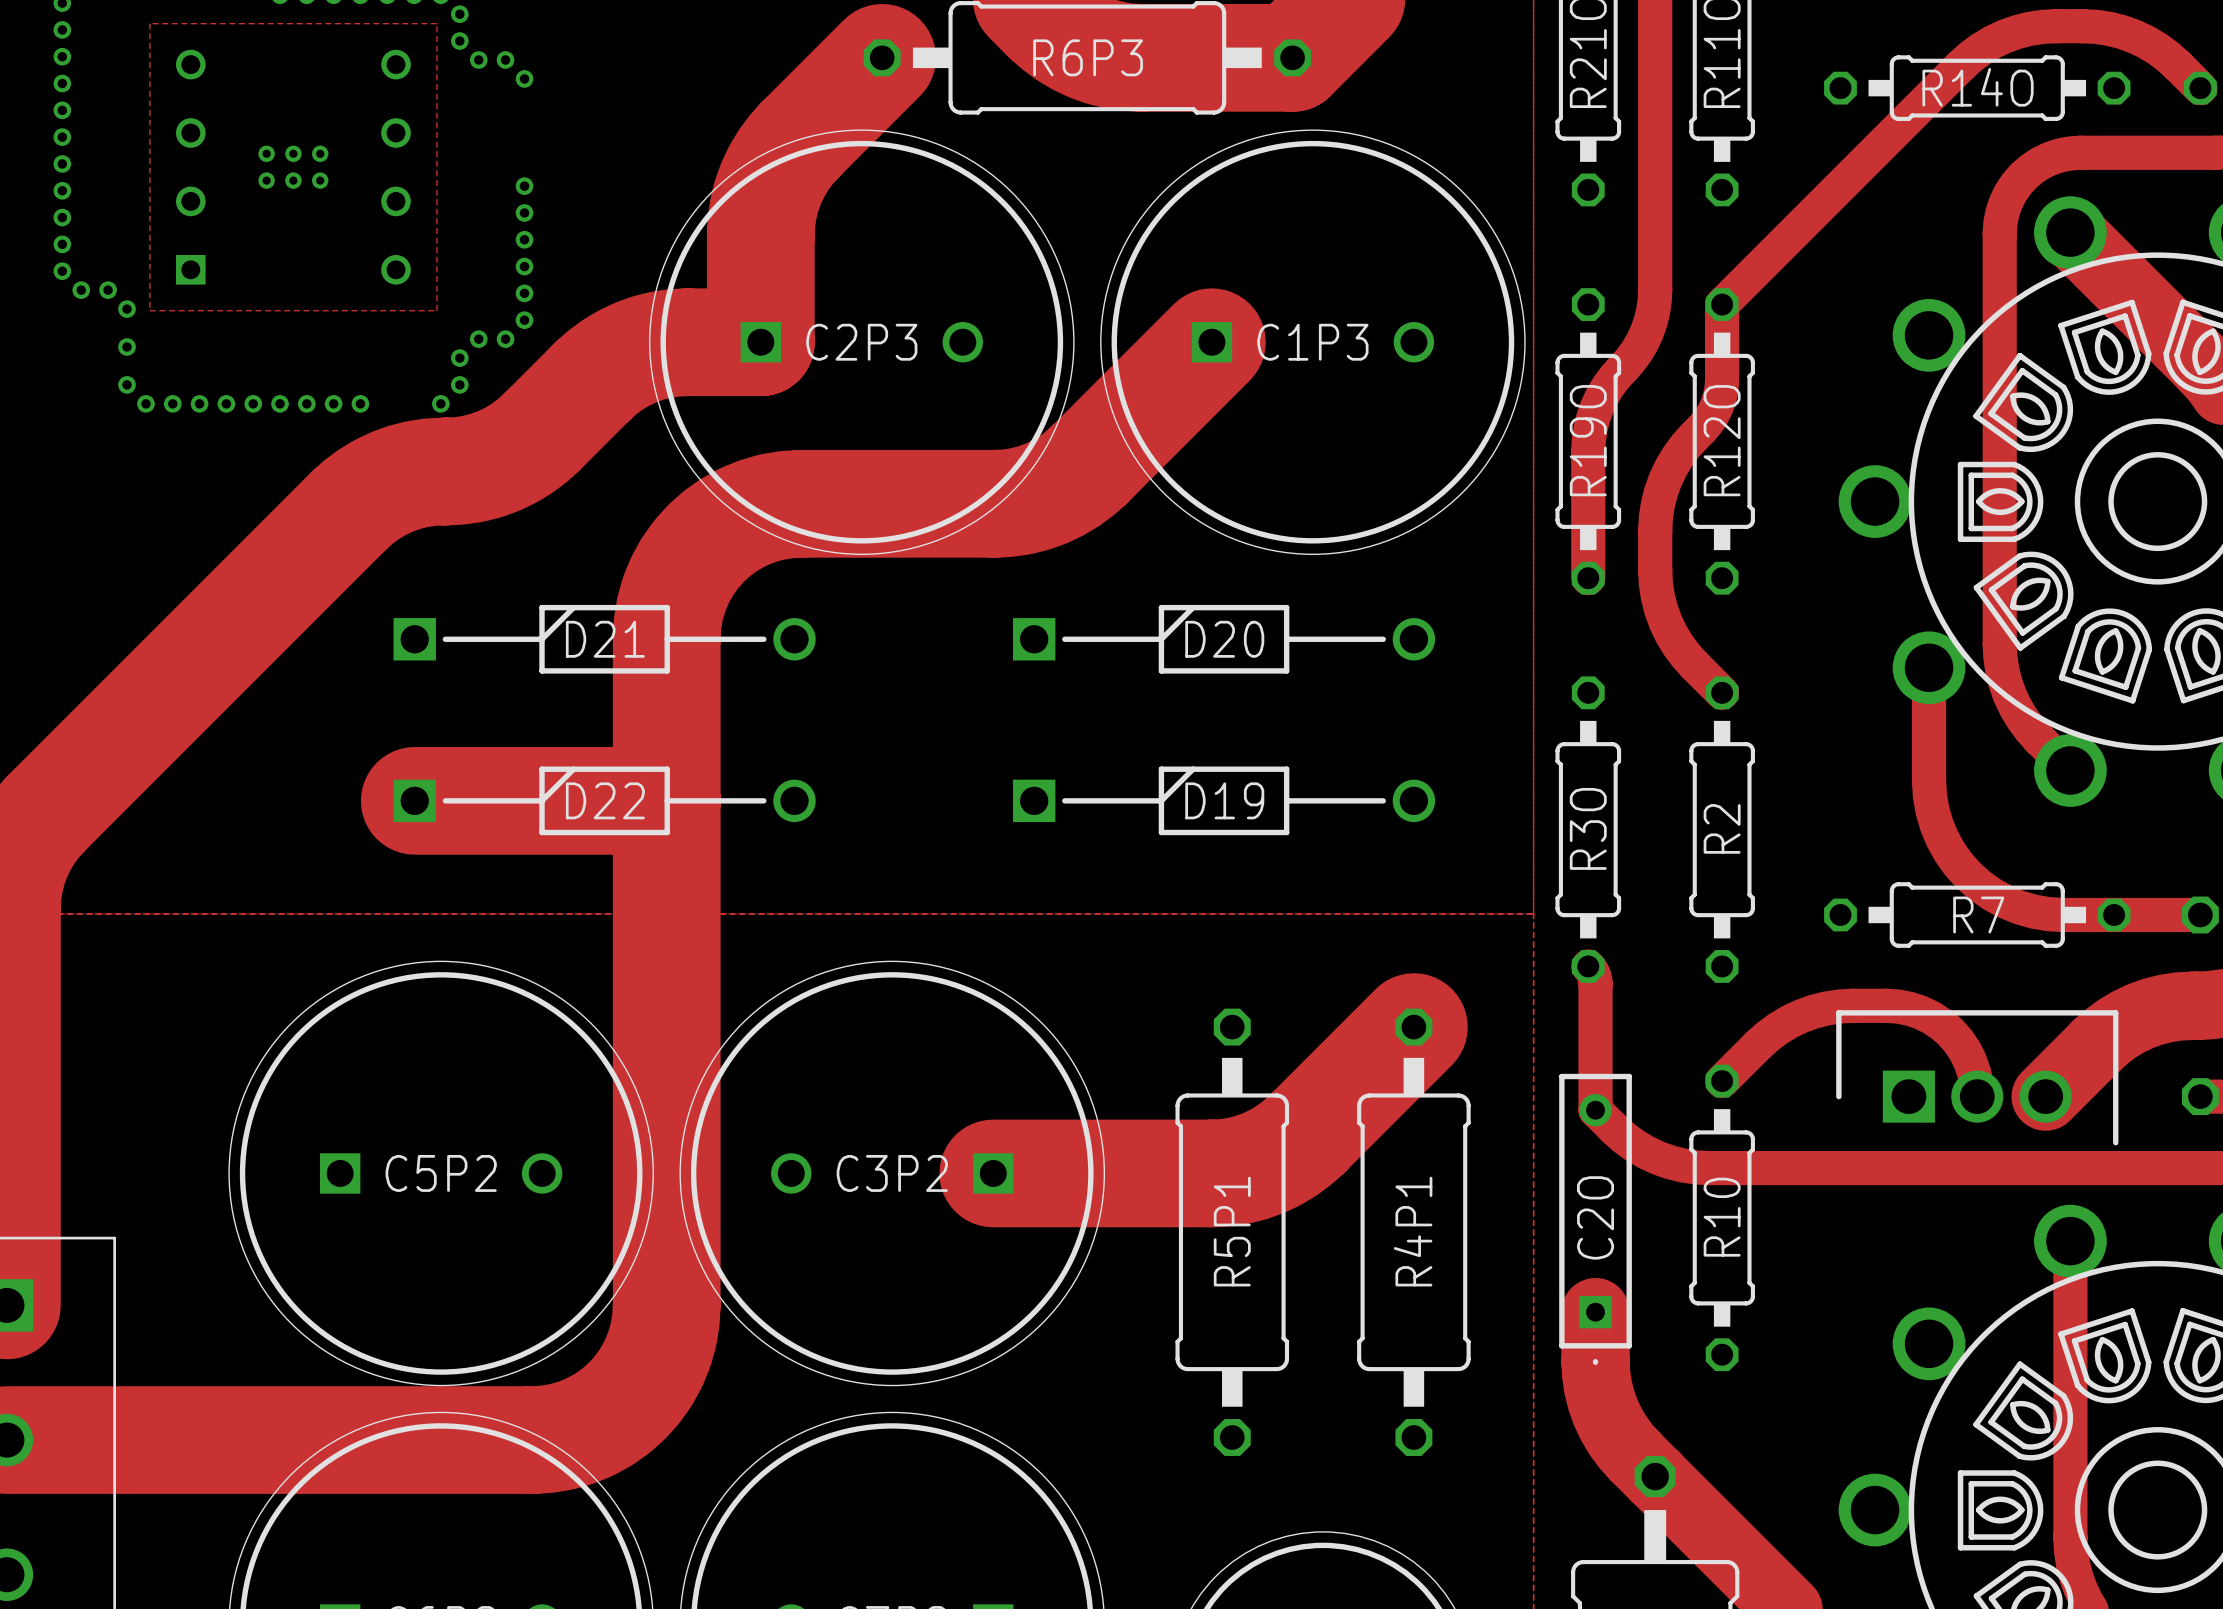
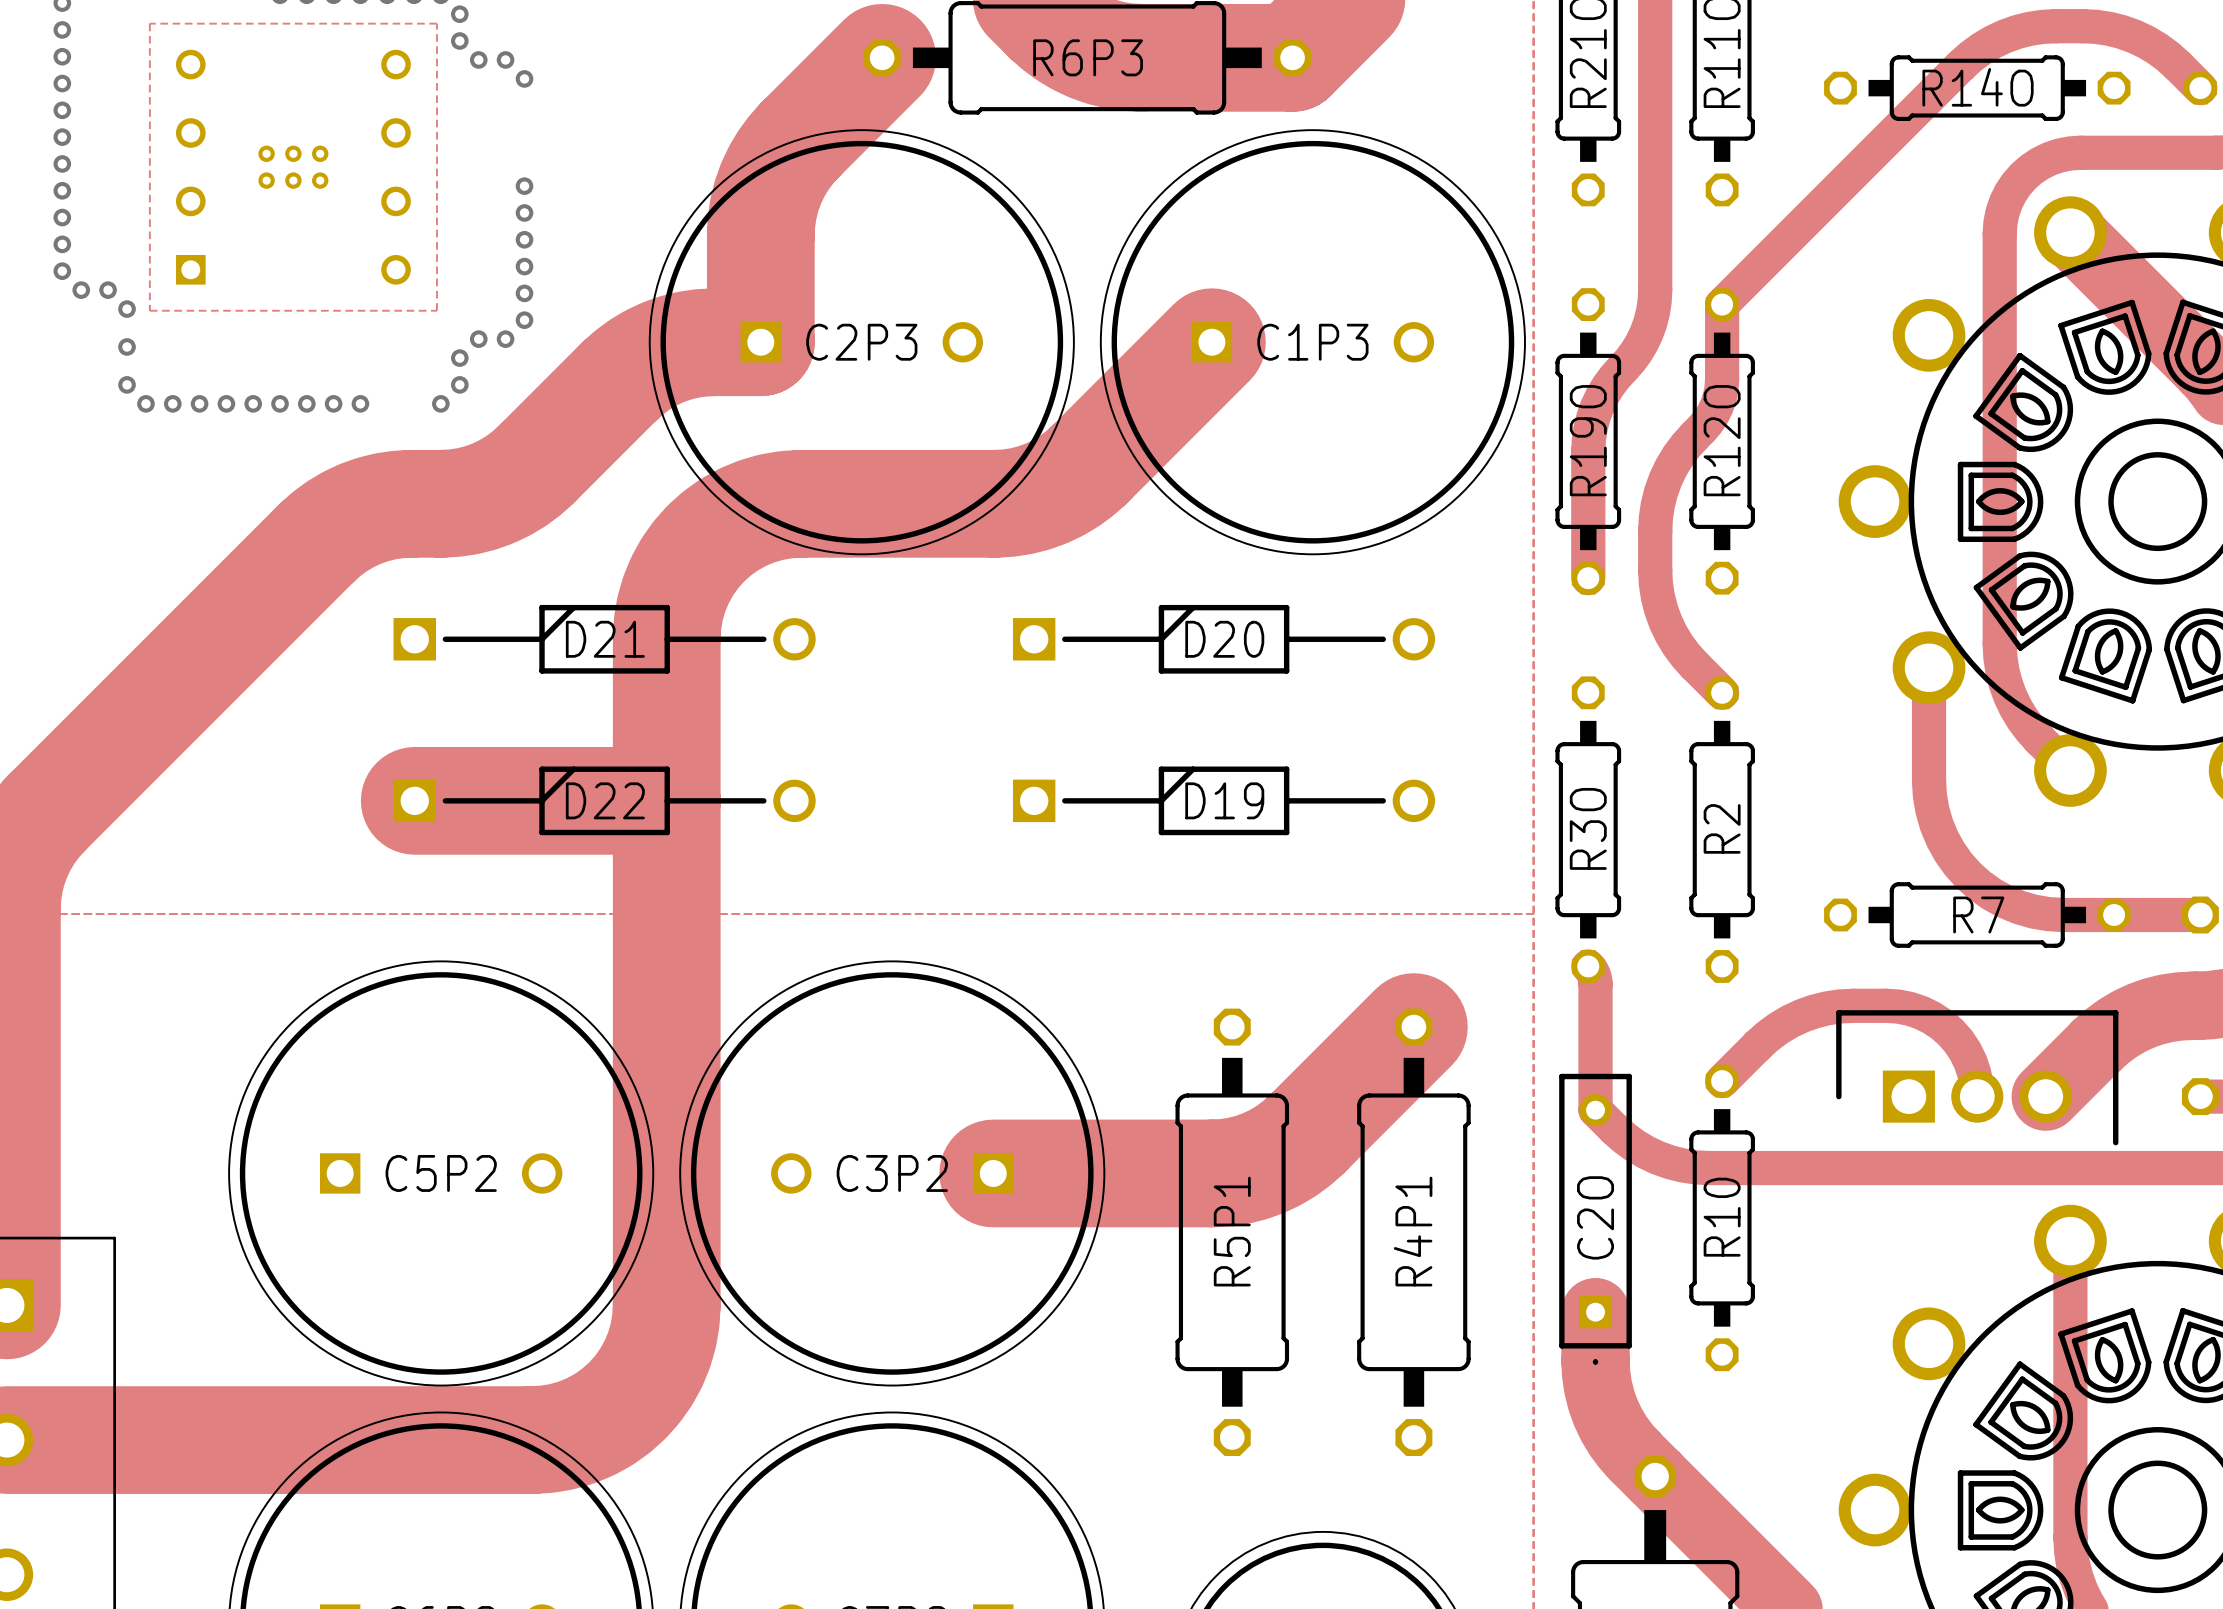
track: (714, 342) (661, 344) (623, 358) (601, 372) (541, 432) (521, 448) (485, 465) (459, 470) (417, 474) (392, 481) (358, 502) (316, 543) -> (714, 342) (675, 348) (639, 364) (619, 381) (536, 464) (504, 487) (467, 501) (398, 504) (372, 509) (348, 519) (316, 543)

